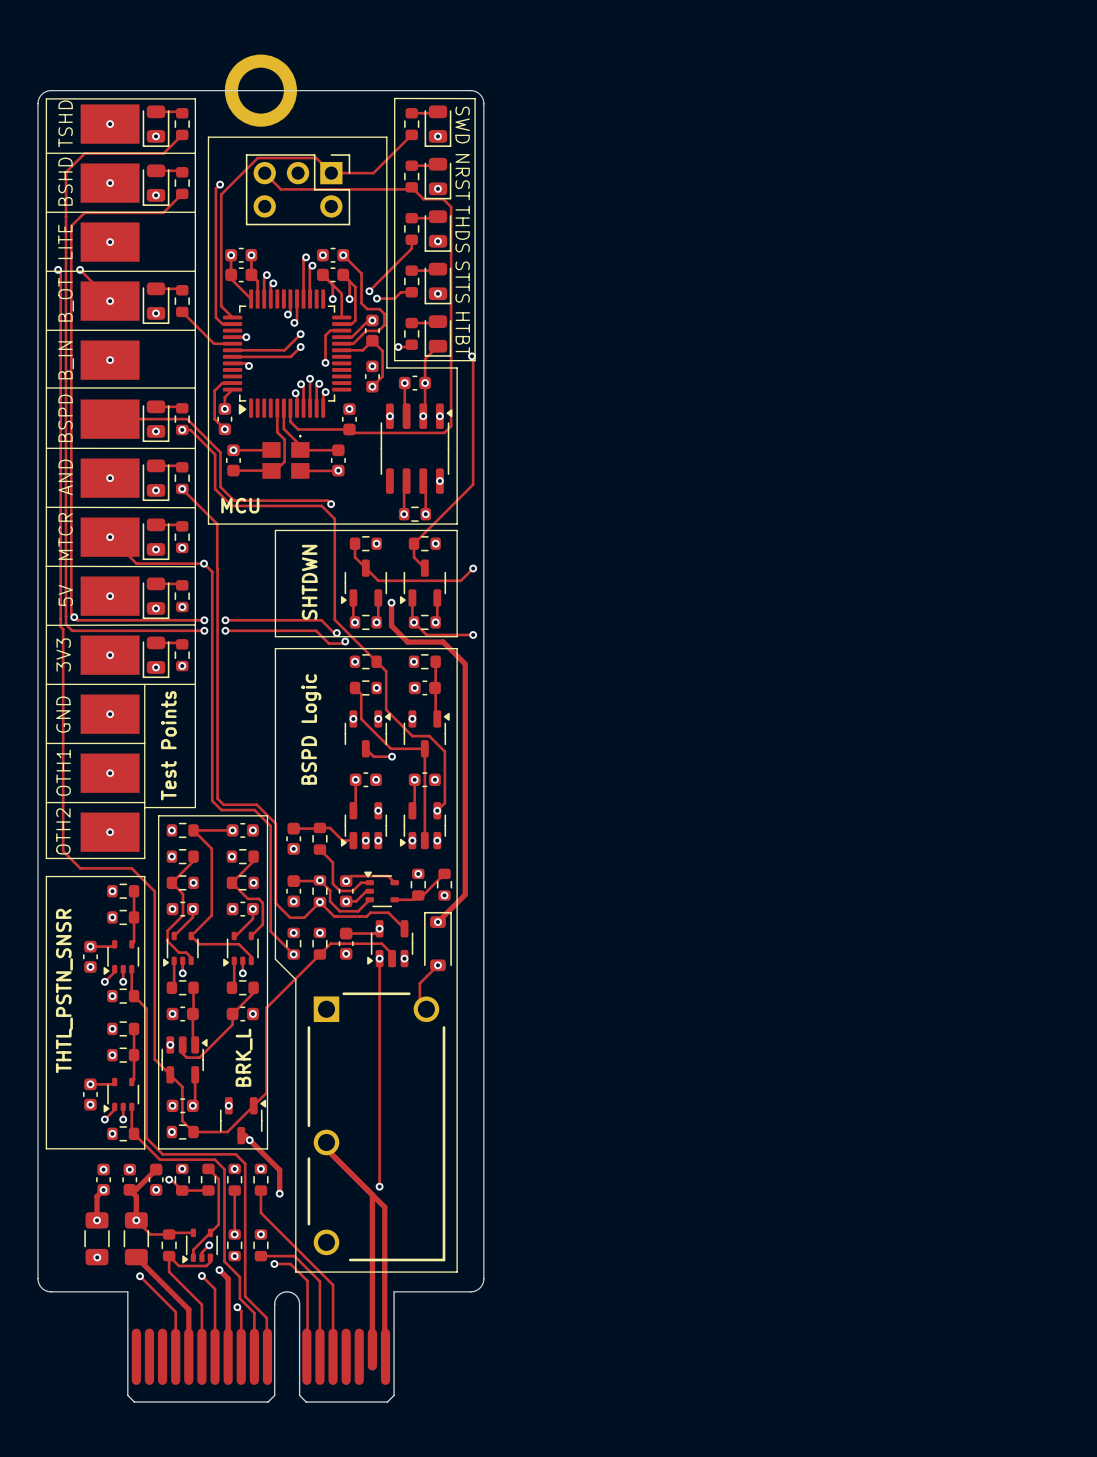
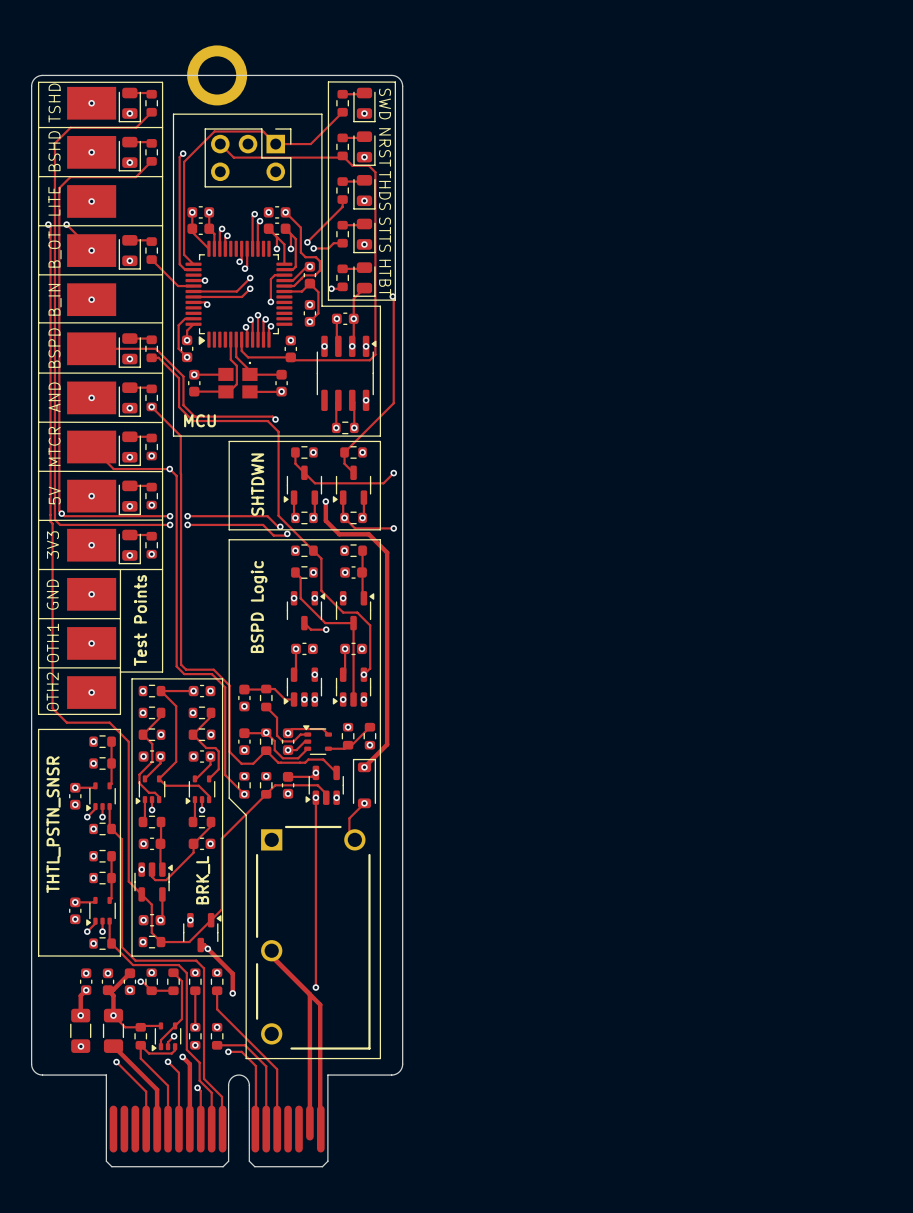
via: (182, 429) -> none
via: (110, 537) -> none
via: (319, 902) -> none

